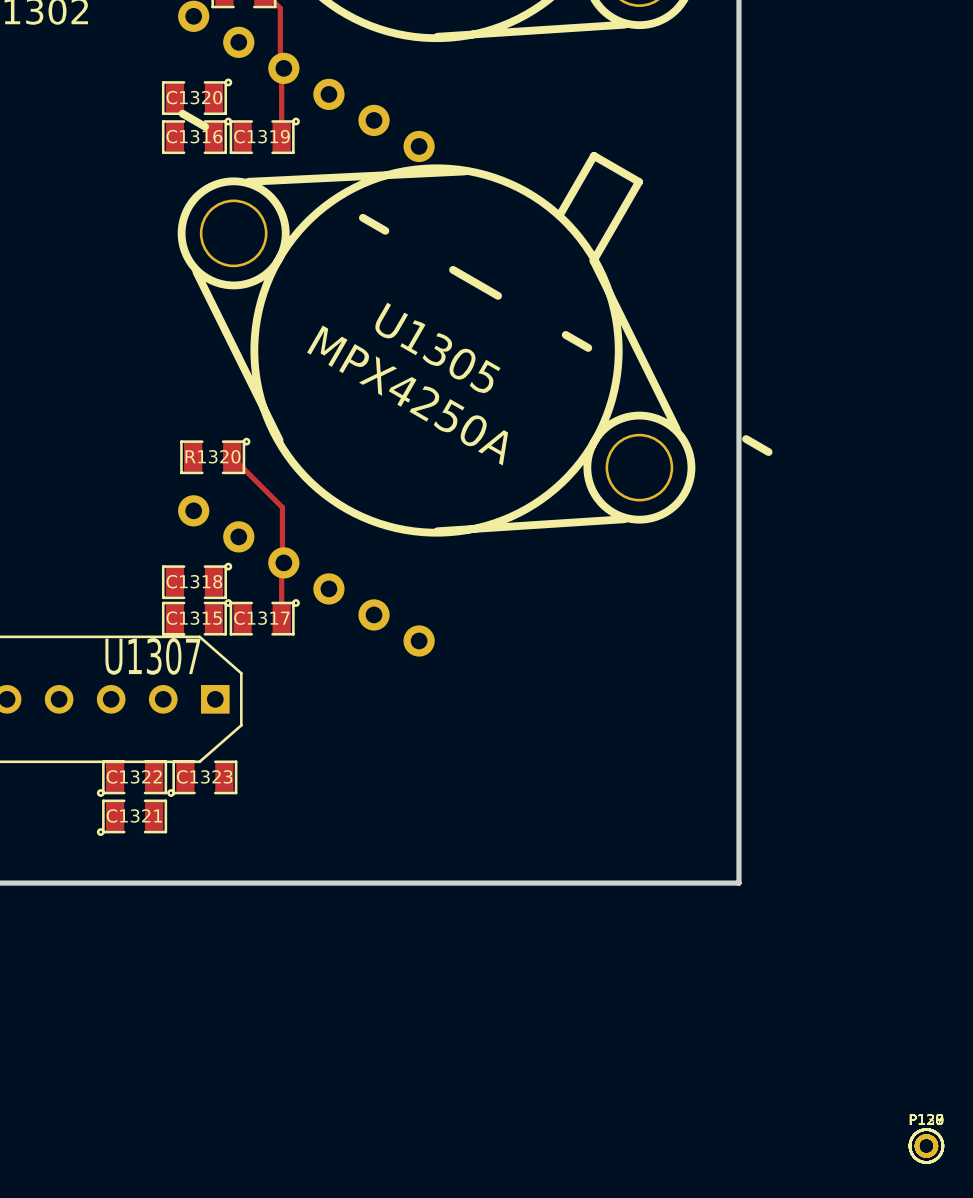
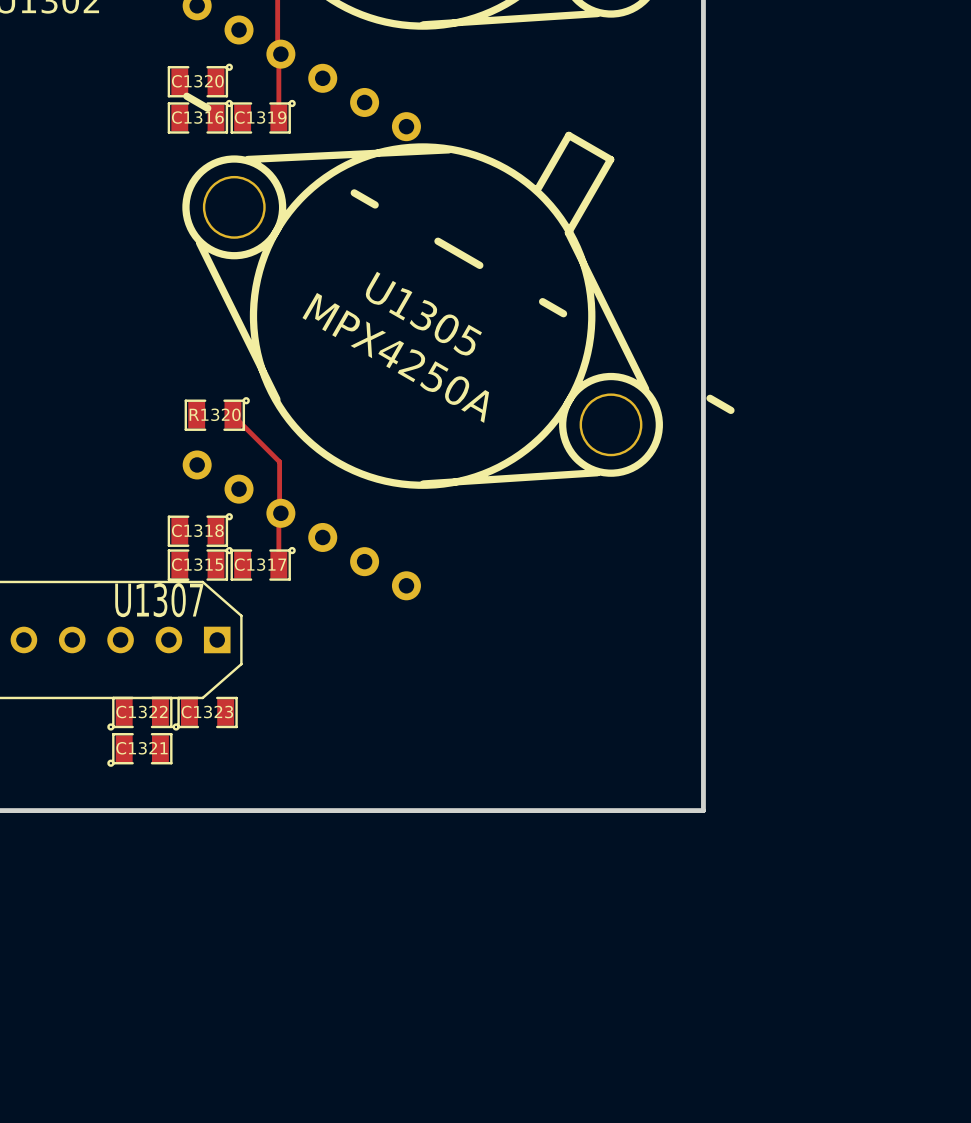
part: (926, 1146) -> none
part: (926, 1146) -> none
part: (926, 1146) -> none
part: (926, 1146) -> none

